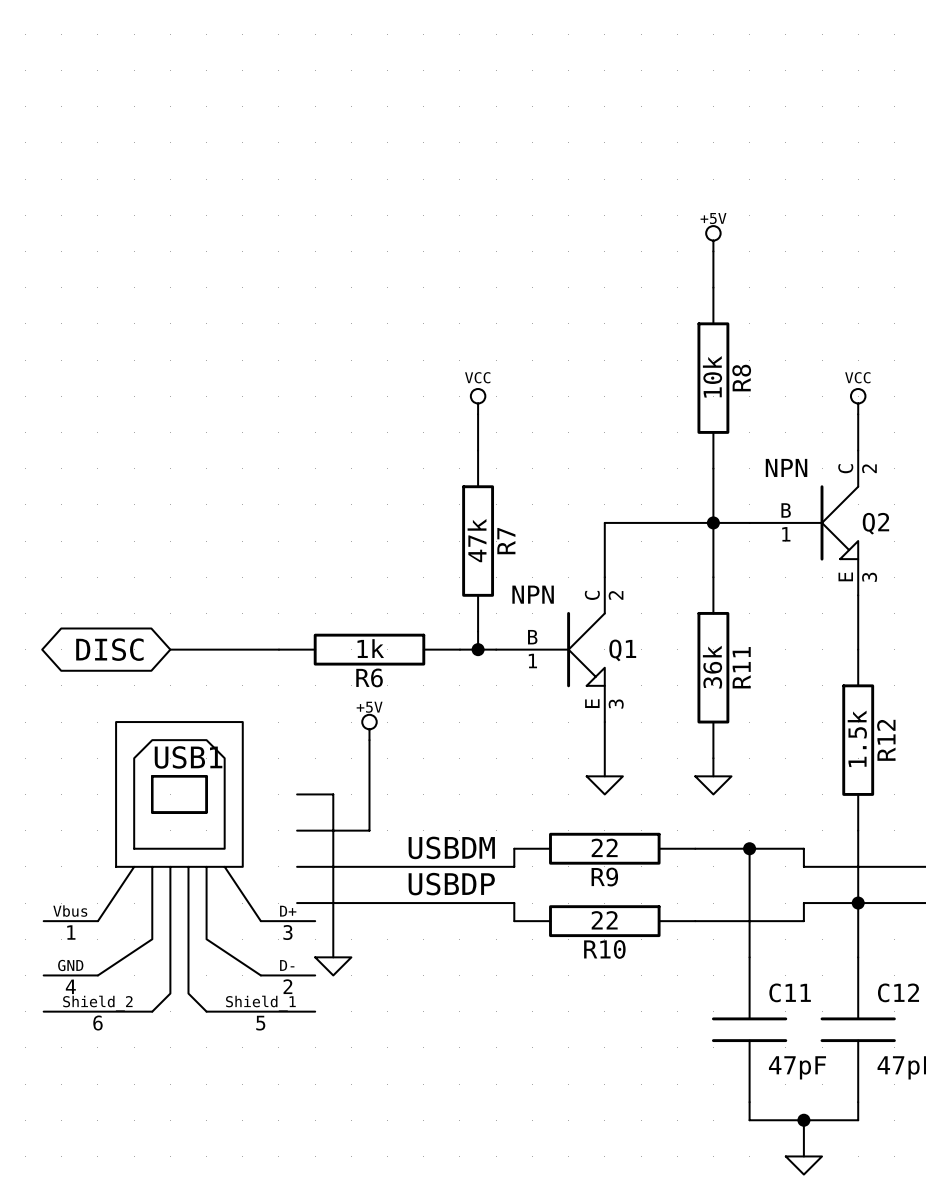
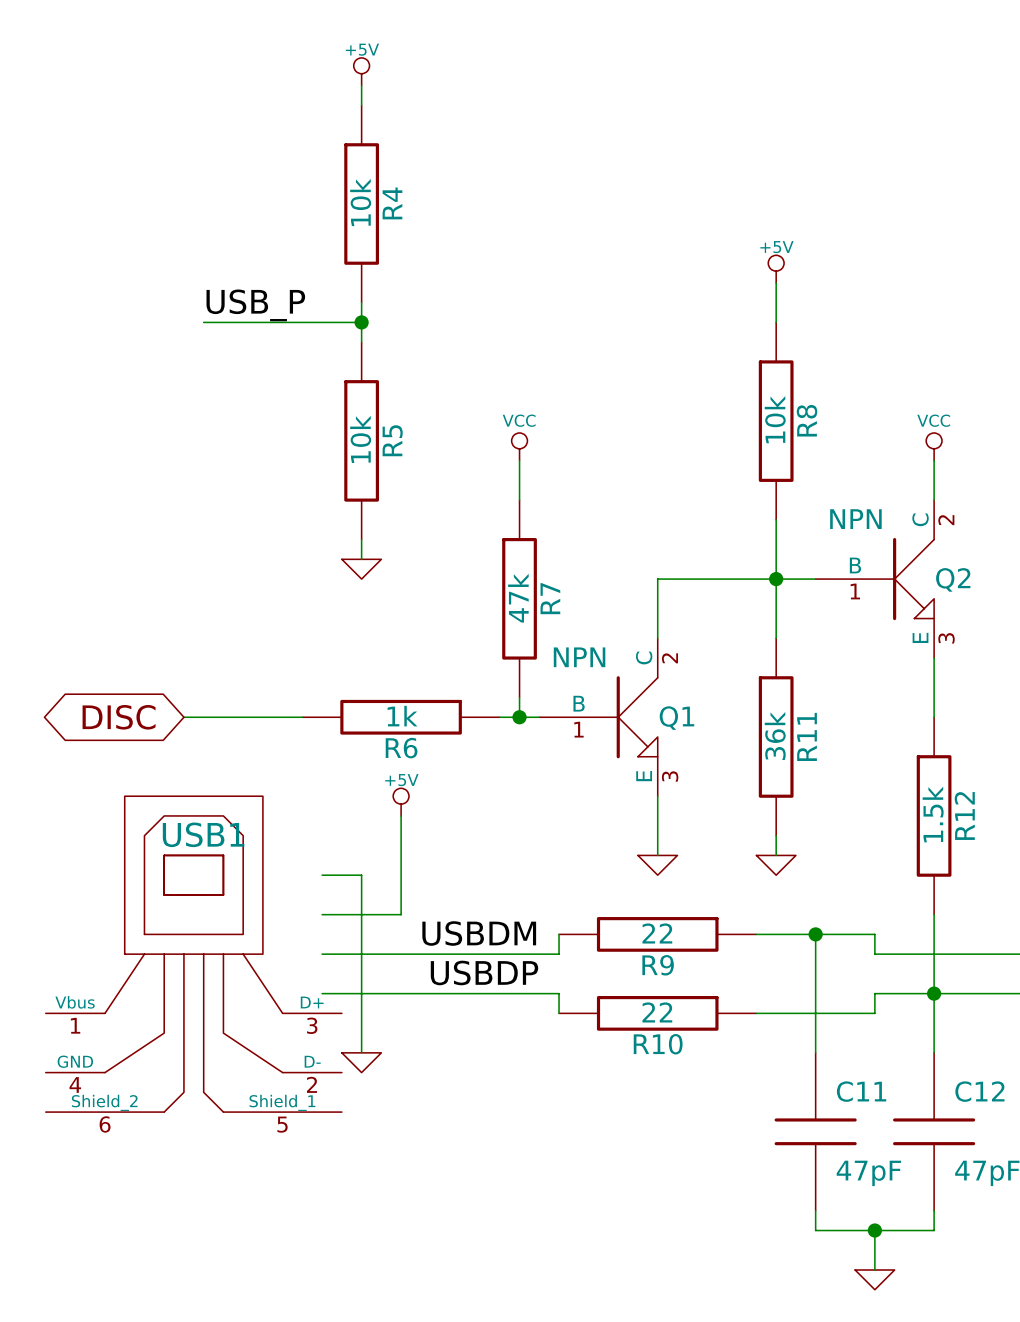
power symbol: none -> +5V (361, 71)
wire: none -> (361, 85) (361, 105)
R4: none -> 10k (361, 203)
wire: none -> (361, 302) (361, 342)
label: none -> USB_P (255, 305)
wire: none -> (203, 322) (361, 322)
junction: none -> (361, 322)
R5: none -> 10k (361, 440)
wire: none -> (361, 539) (361, 559)
power symbol: none -> (361, 569)

